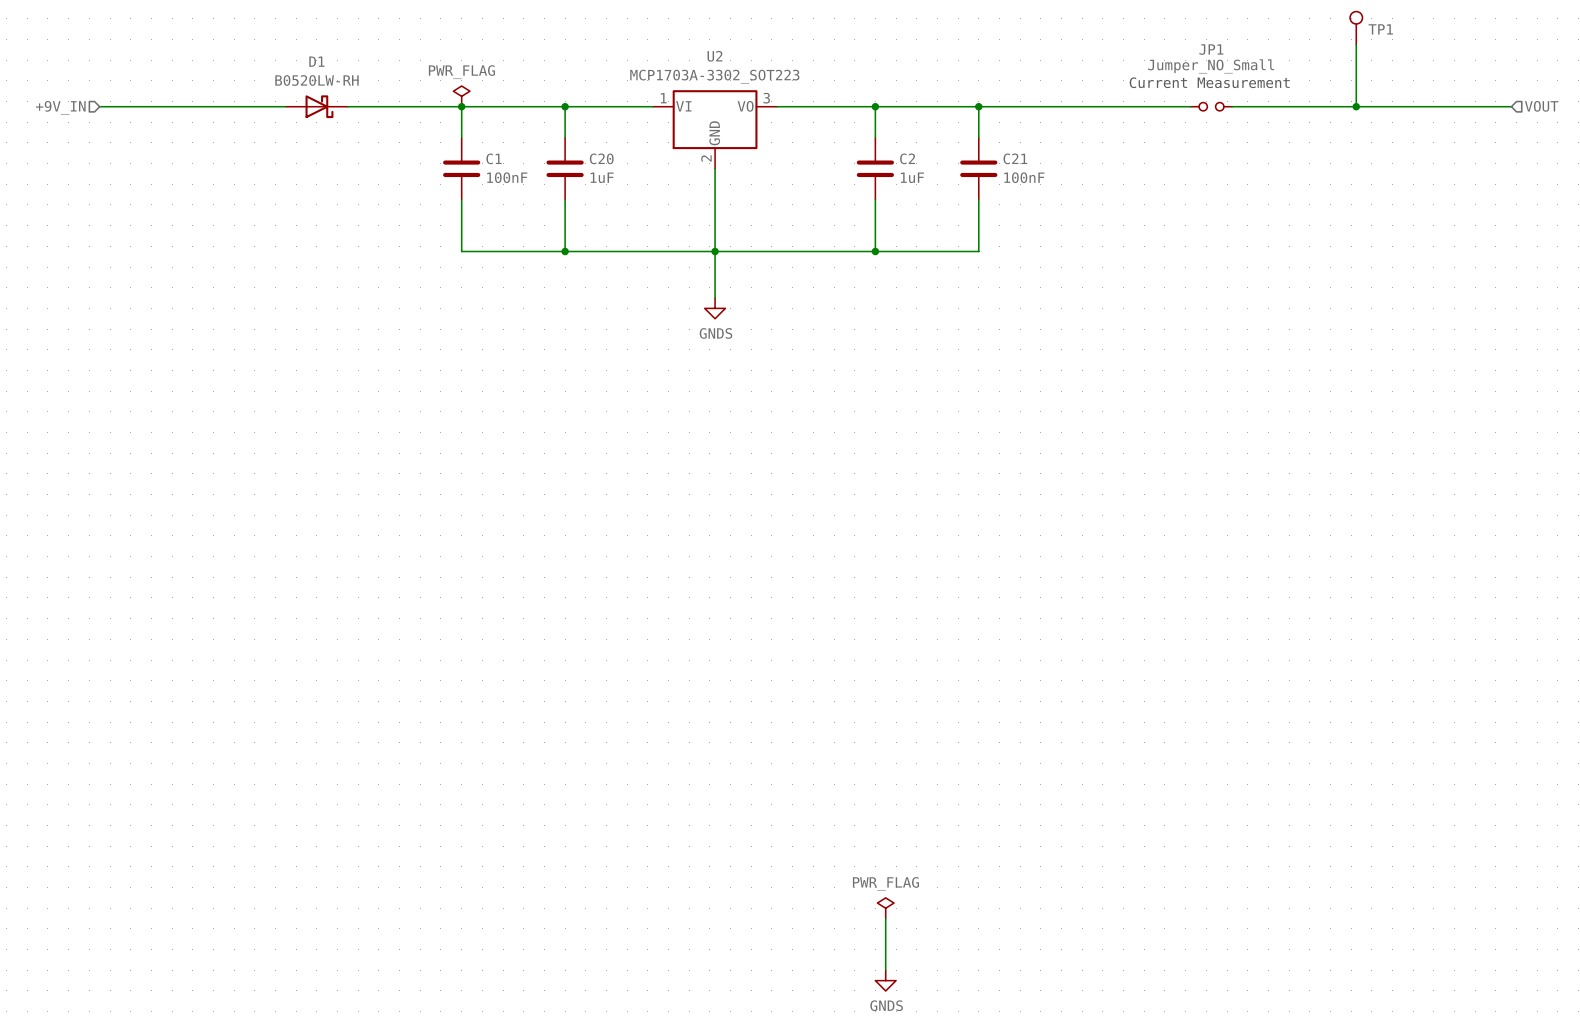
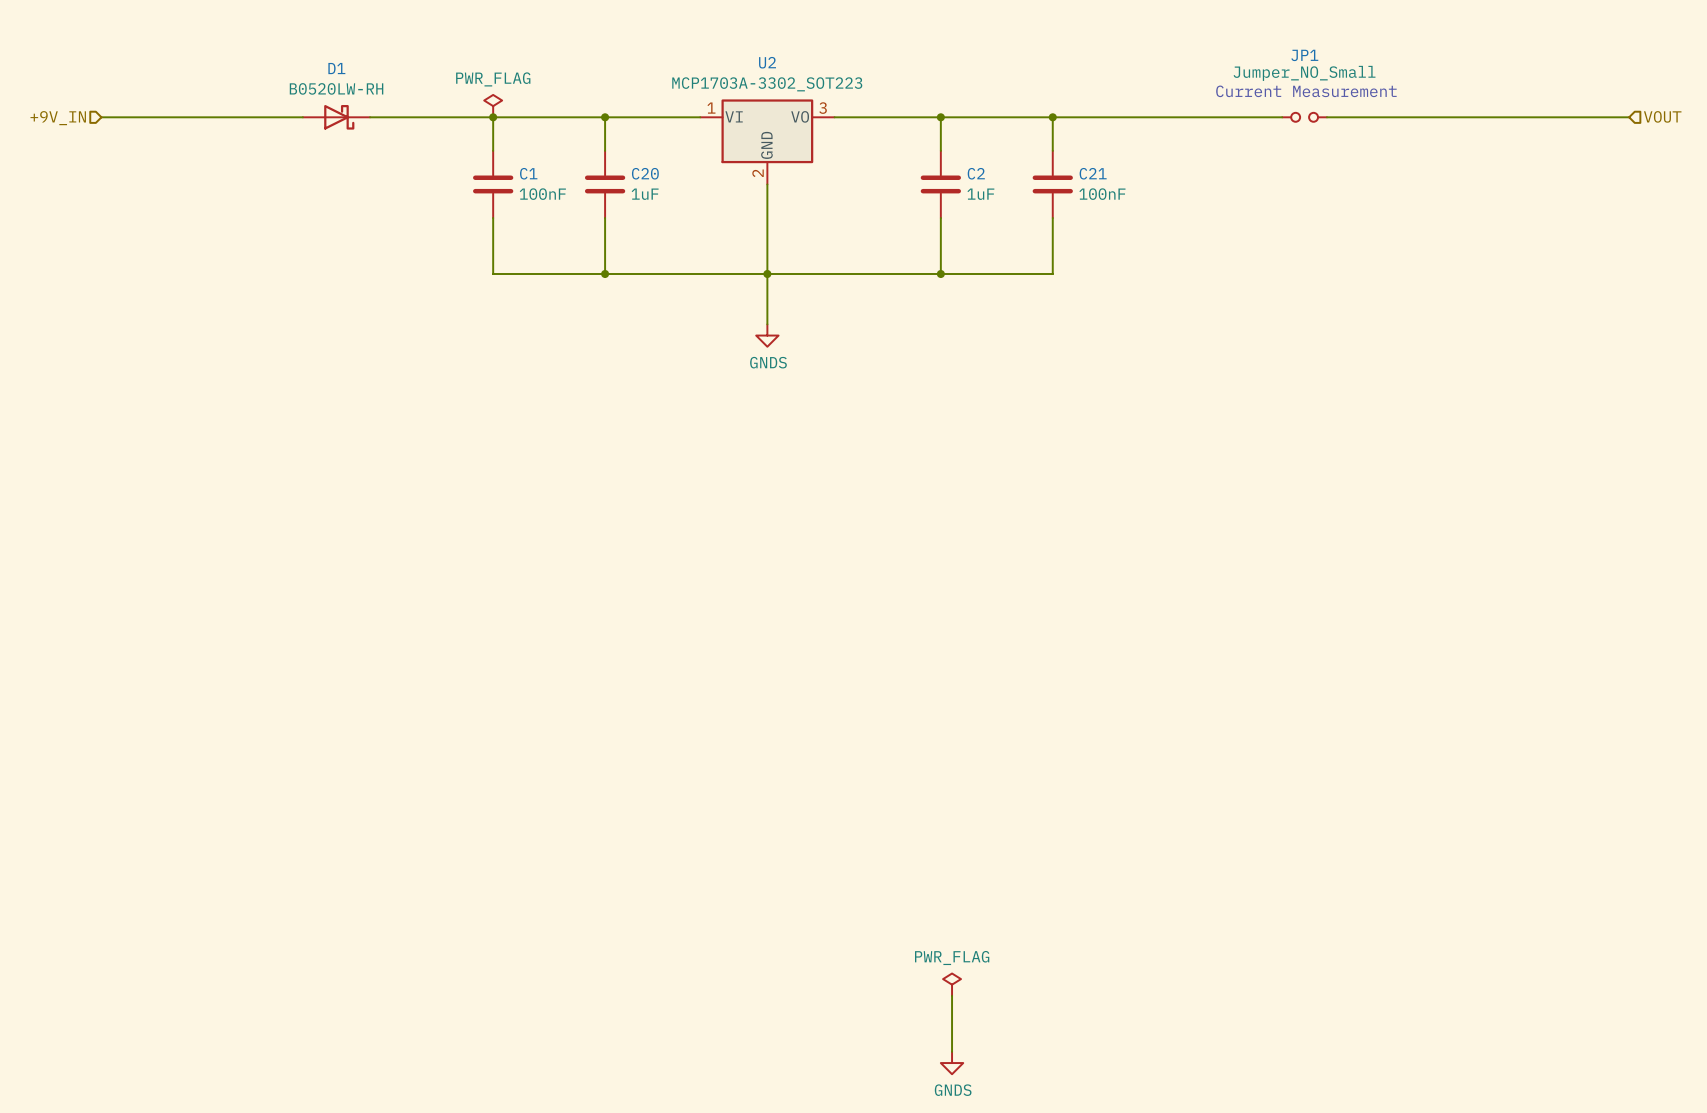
TP1: (1356, 28) -> none
wire: (1356, 44) (1356, 106) -> none
junction: (1356, 106) -> none

